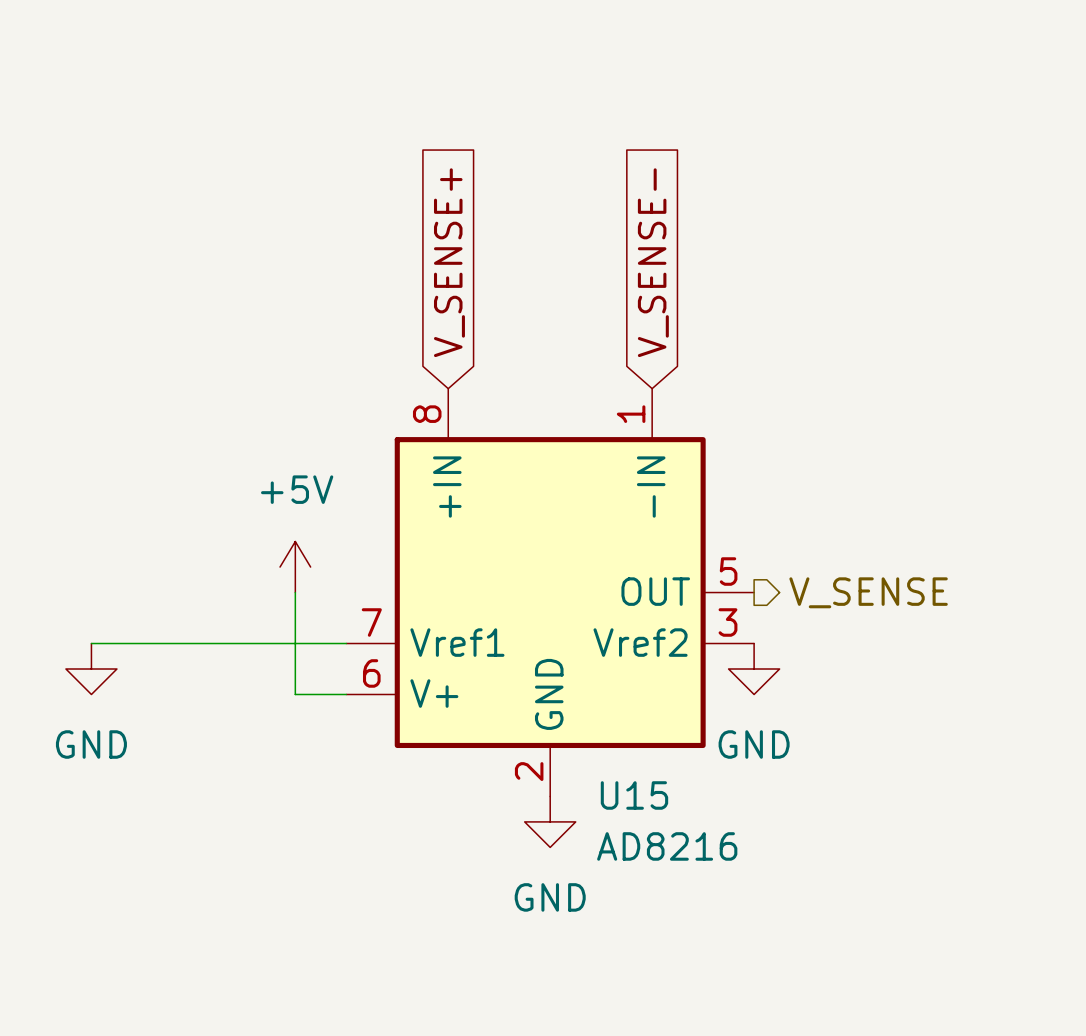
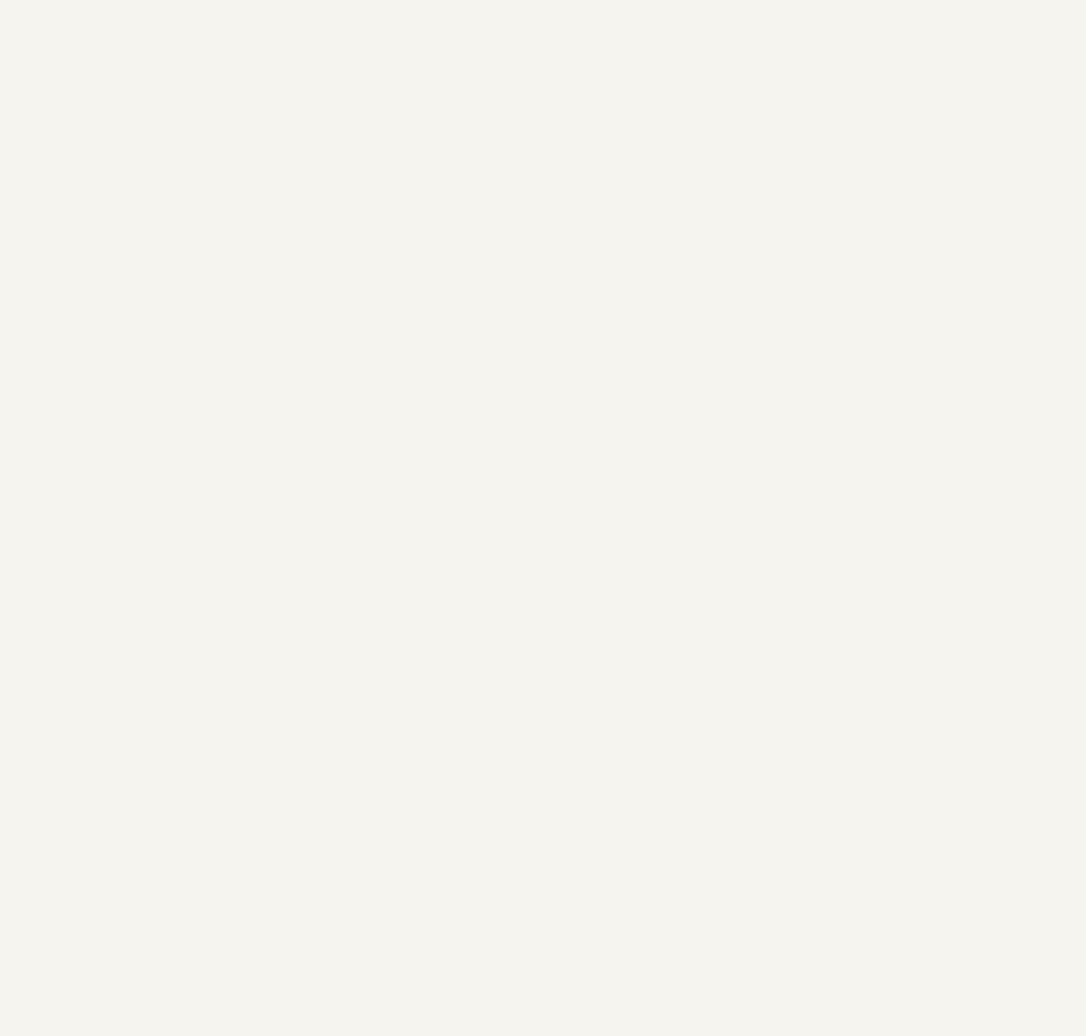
global label: V_SENSE+ (449, 262) -> none
global label: V_SENSE- (653, 262) -> none
power symbol: +5V (295, 567) -> none
wire: (295, 592) (295, 694) (346, 694) -> none
U15: AD8216 (550, 592) -> none
hierarchical label: V_SENSE (868, 592) -> none
wire: (91, 643) (346, 643) -> none
power symbol: GND (91, 669) -> none
power symbol: GND (754, 669) -> none
power symbol: GND (550, 821) -> none

